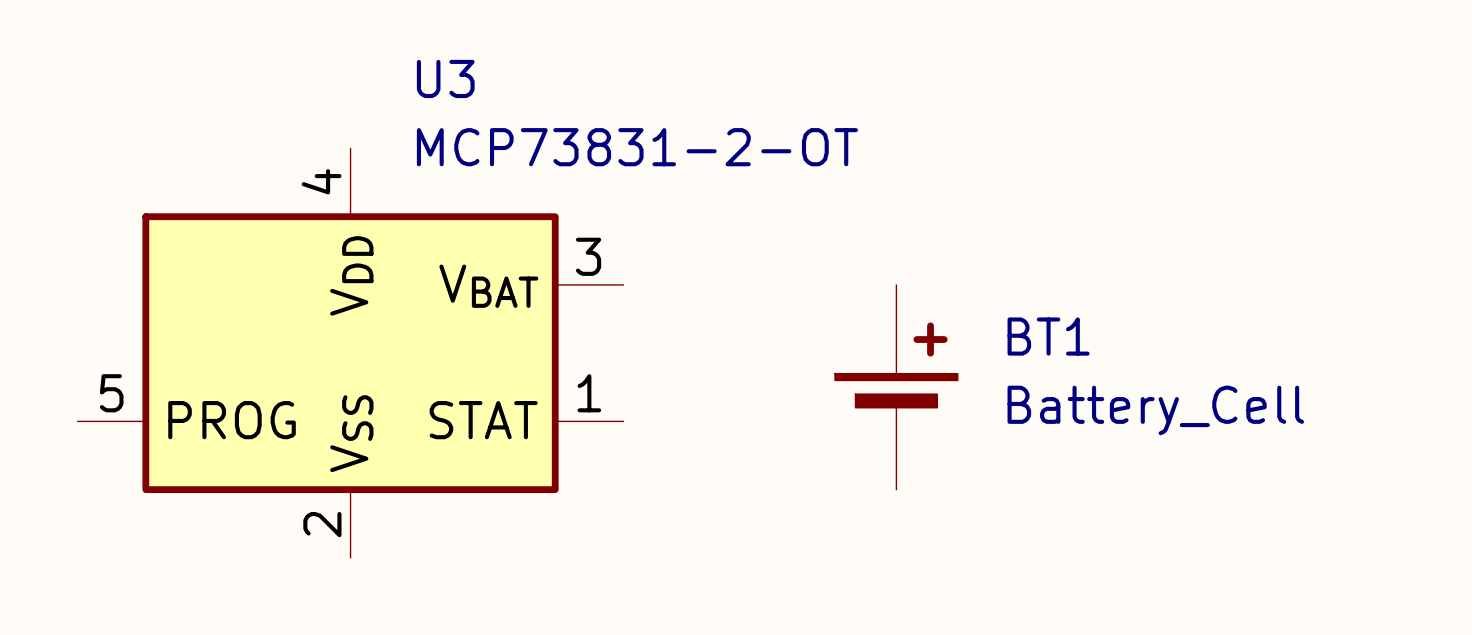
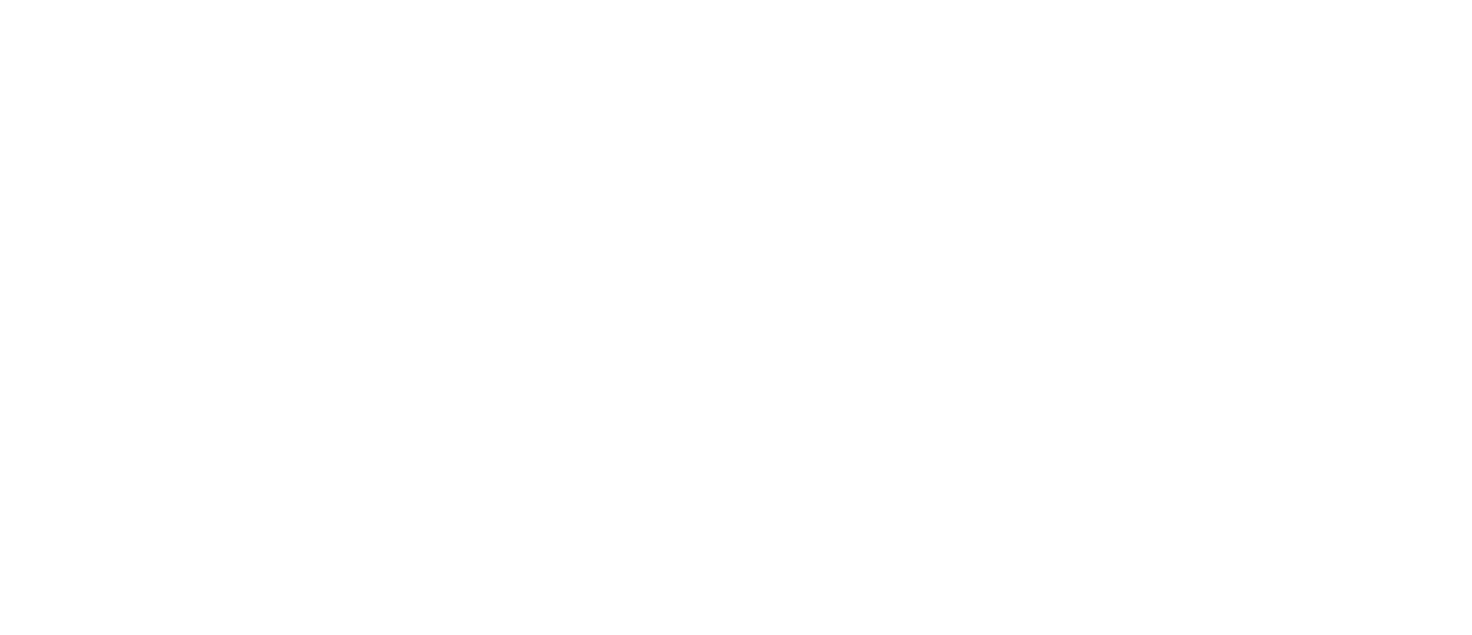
U3: MCP73831-2-OT (350, 353) -> none
BT1: Battery_Cell (896, 387) -> none

